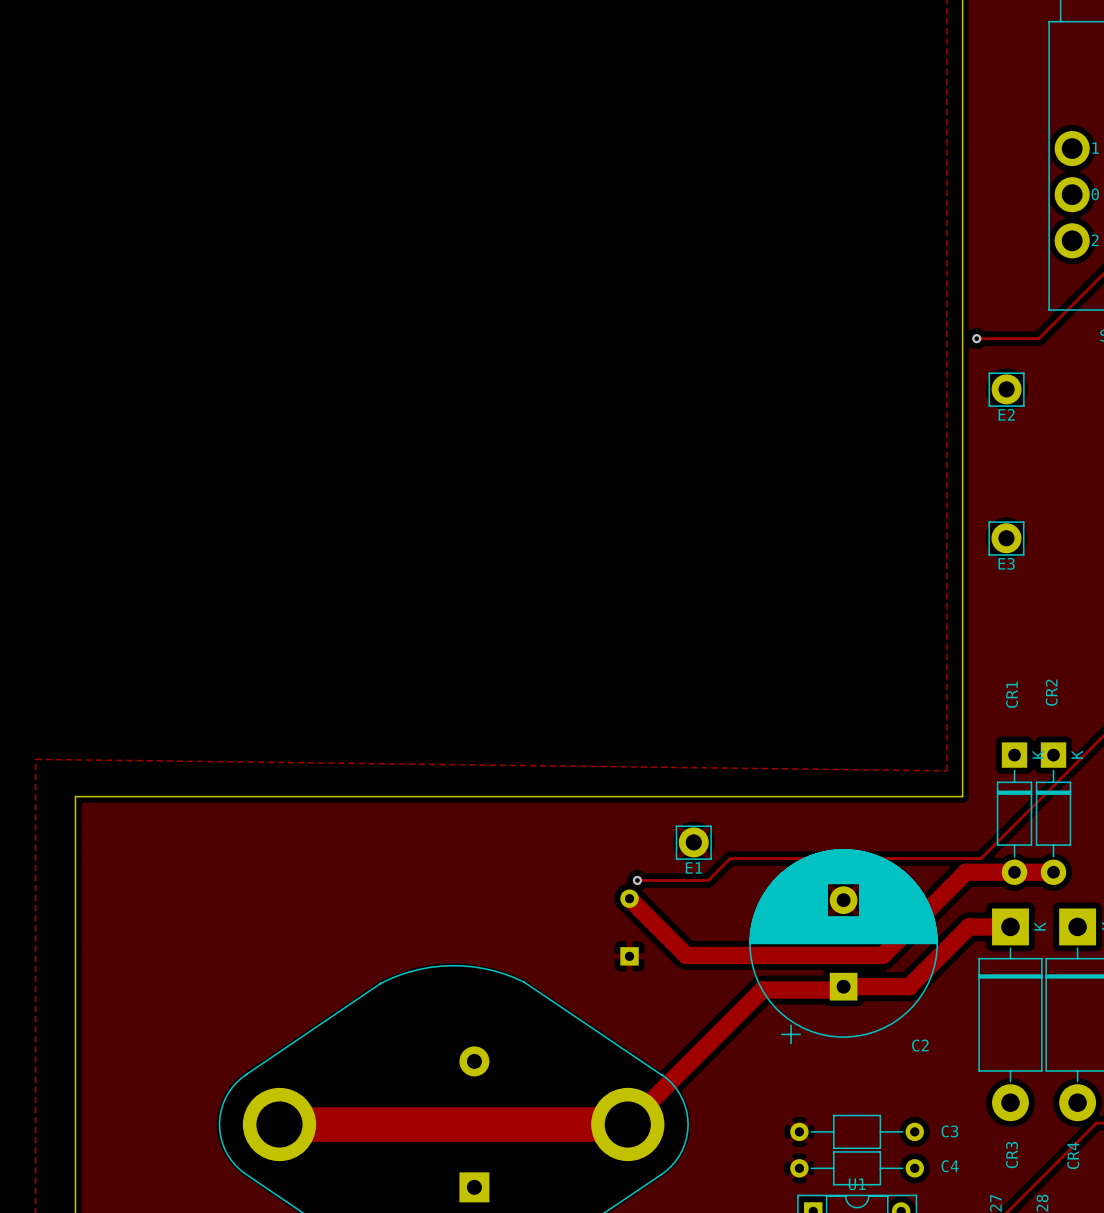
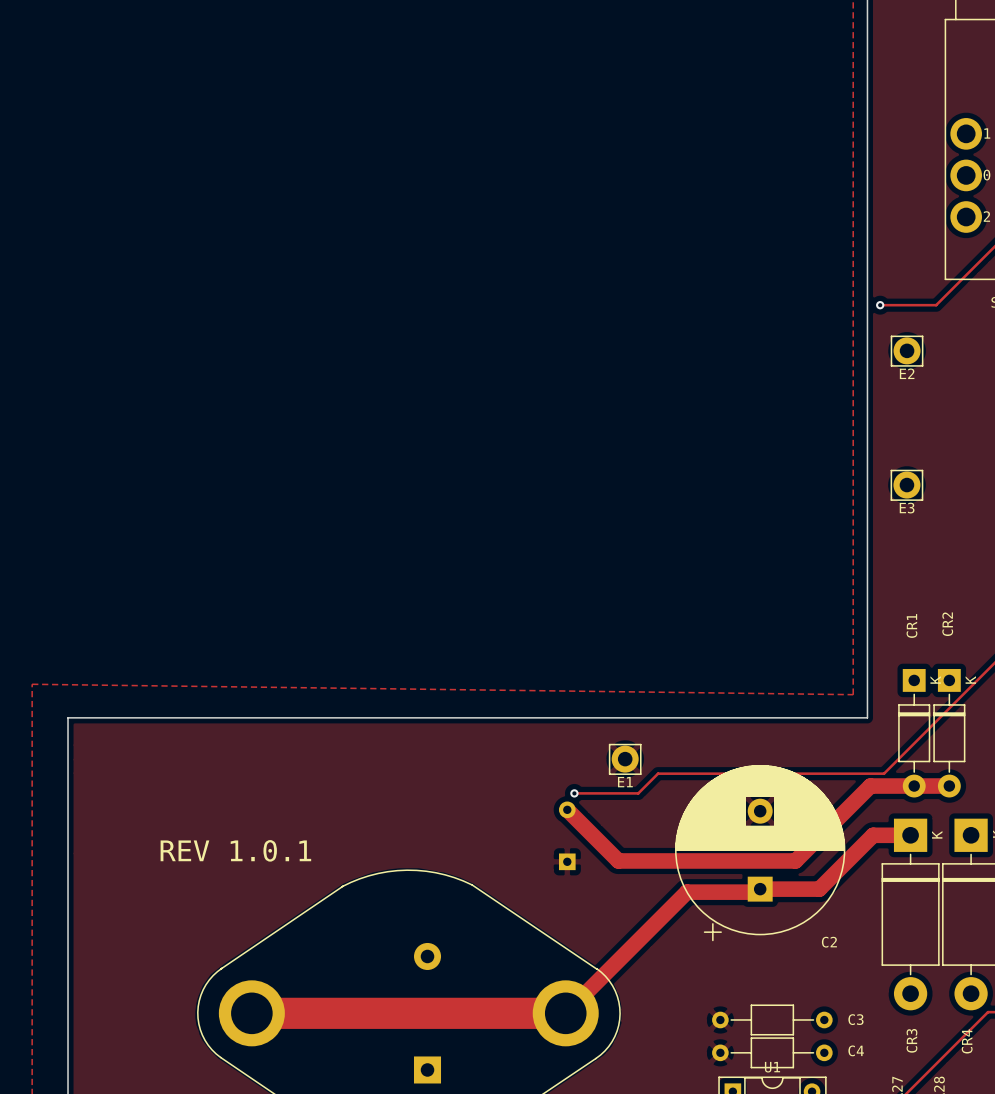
text: none -> REV 1.0.1 (235, 850)

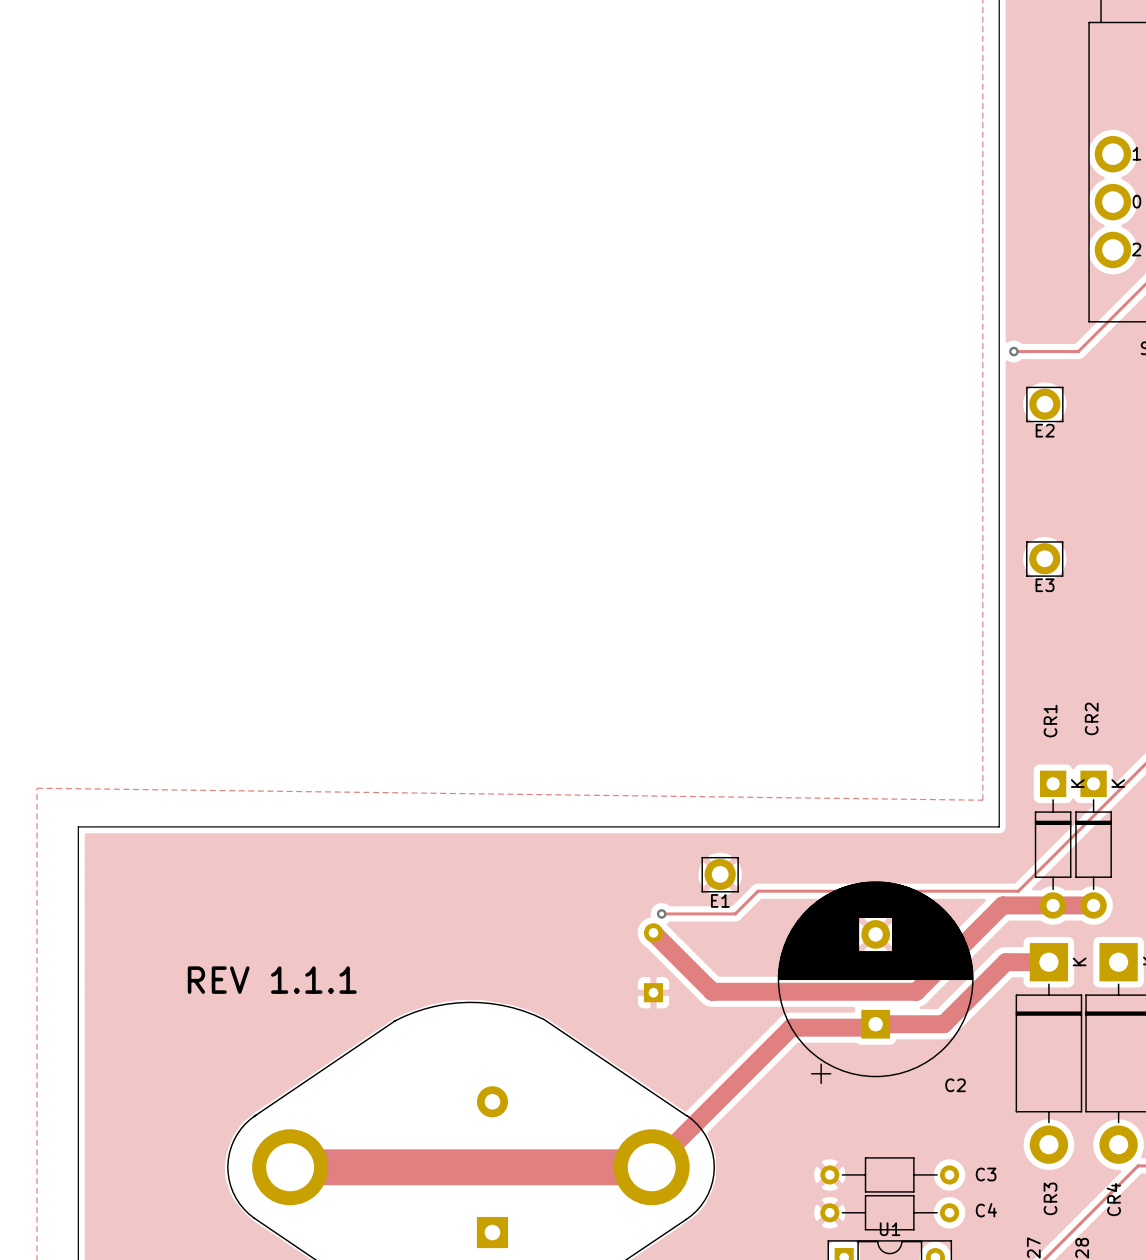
text: REV 1.0.1 (235, 850) -> REV 1.1.1 (272, 980)

